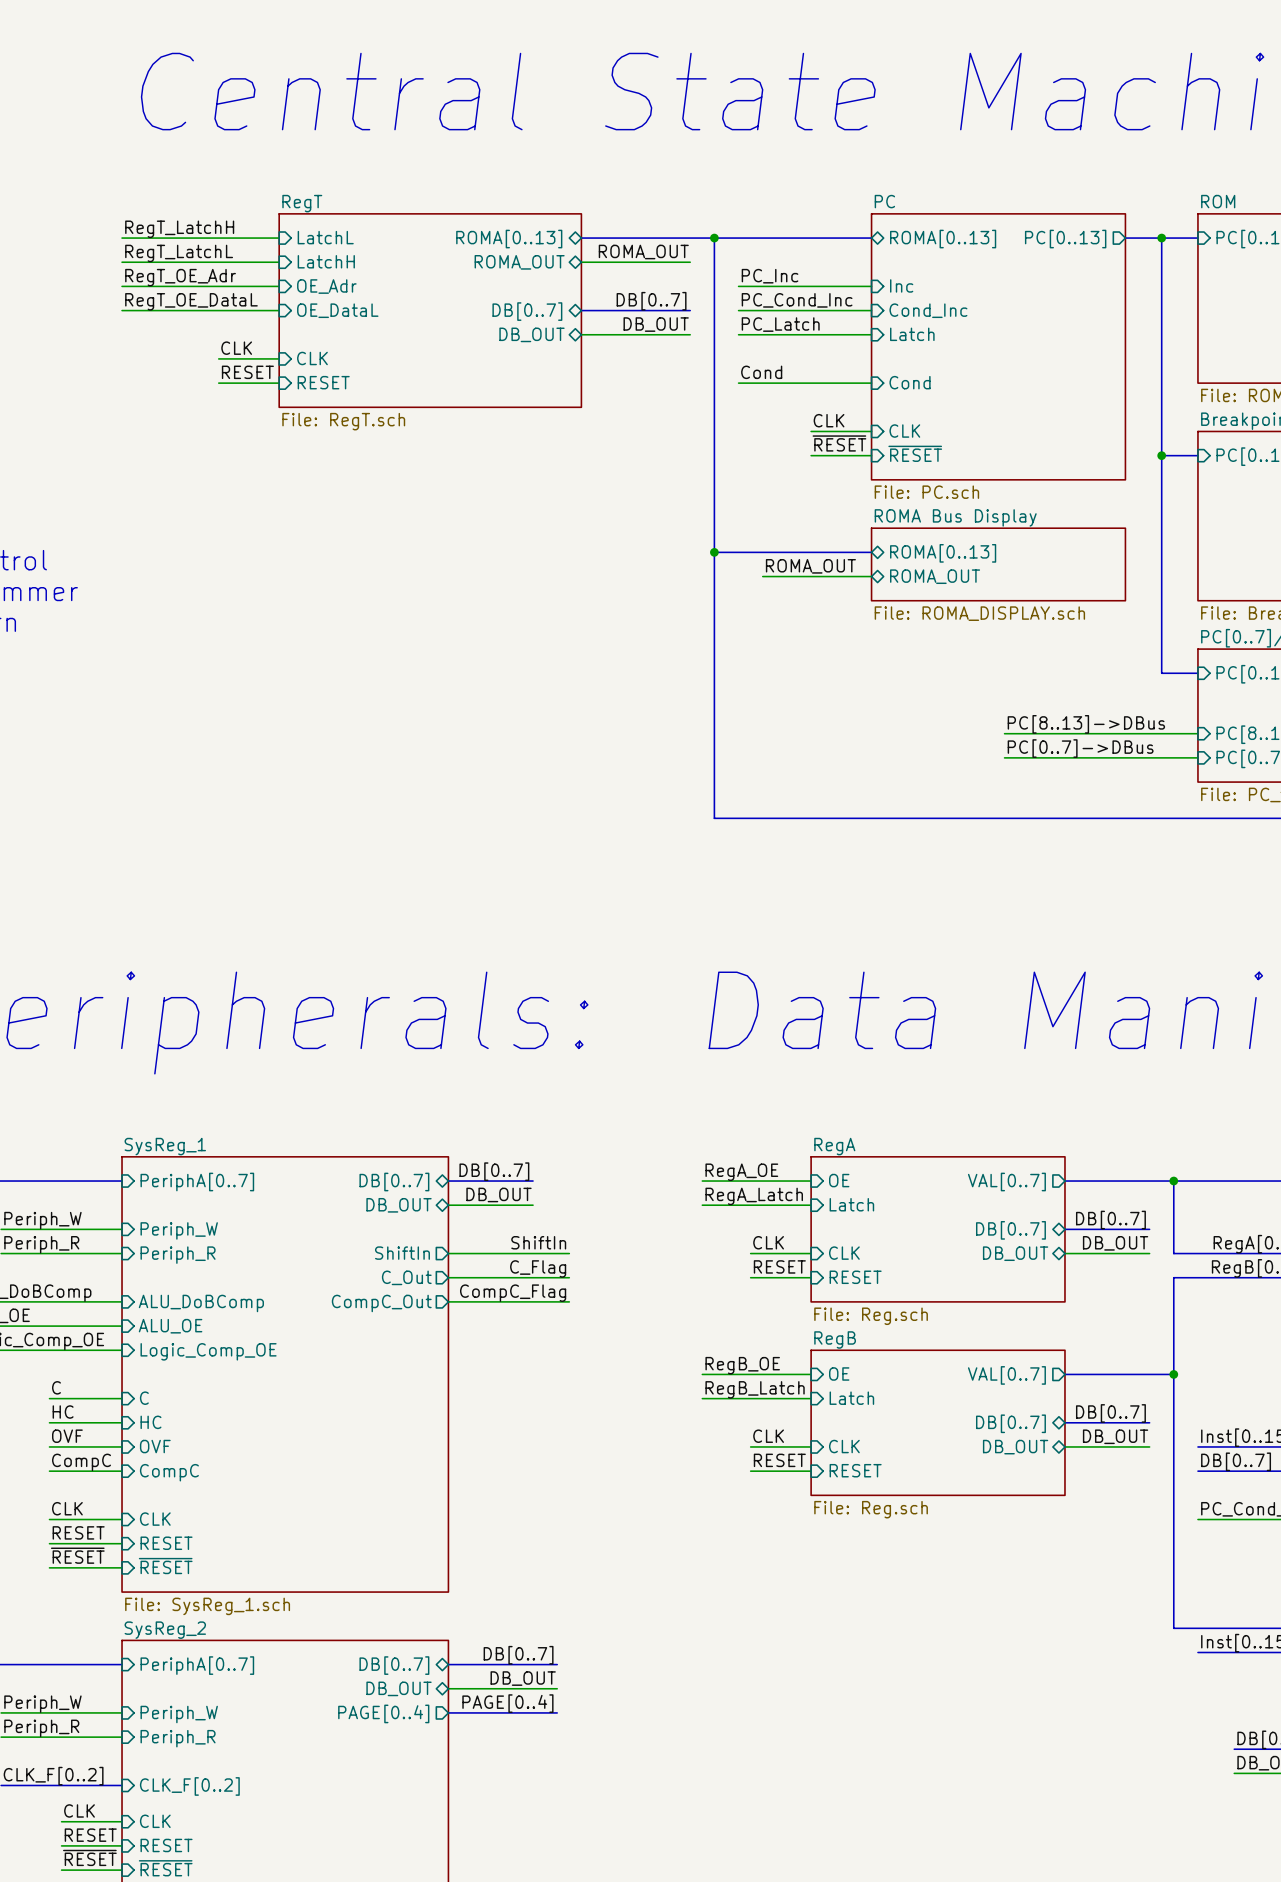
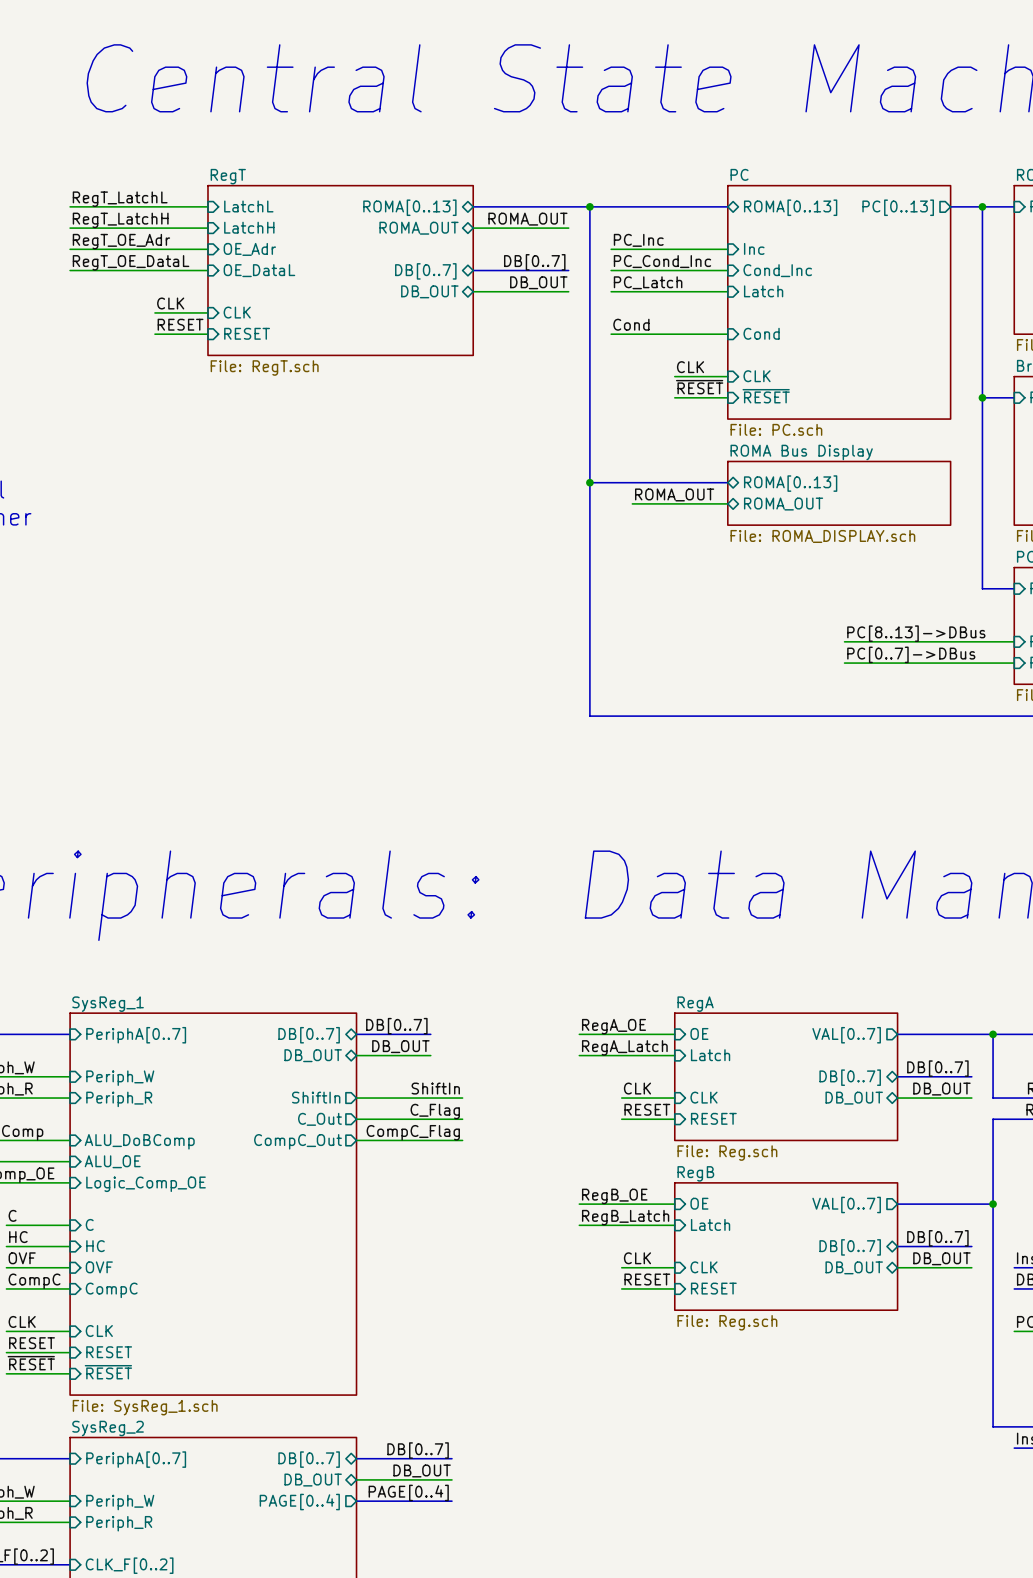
label: RegT_LatchH (179, 229) -> RegT_LatchL (120, 199)
label: RegT_LatchL (179, 253) -> RegT_LatchH (120, 220)

